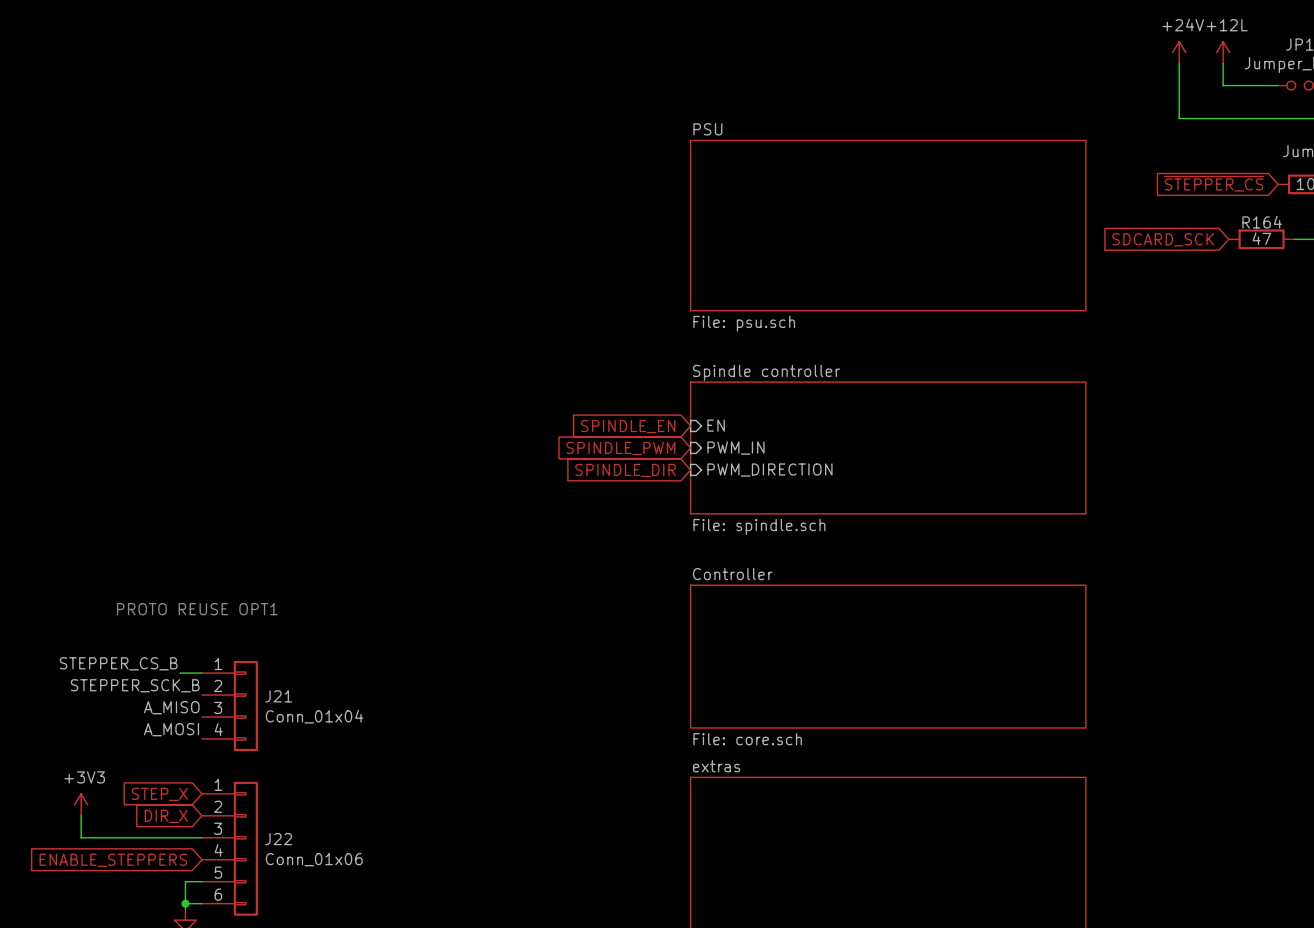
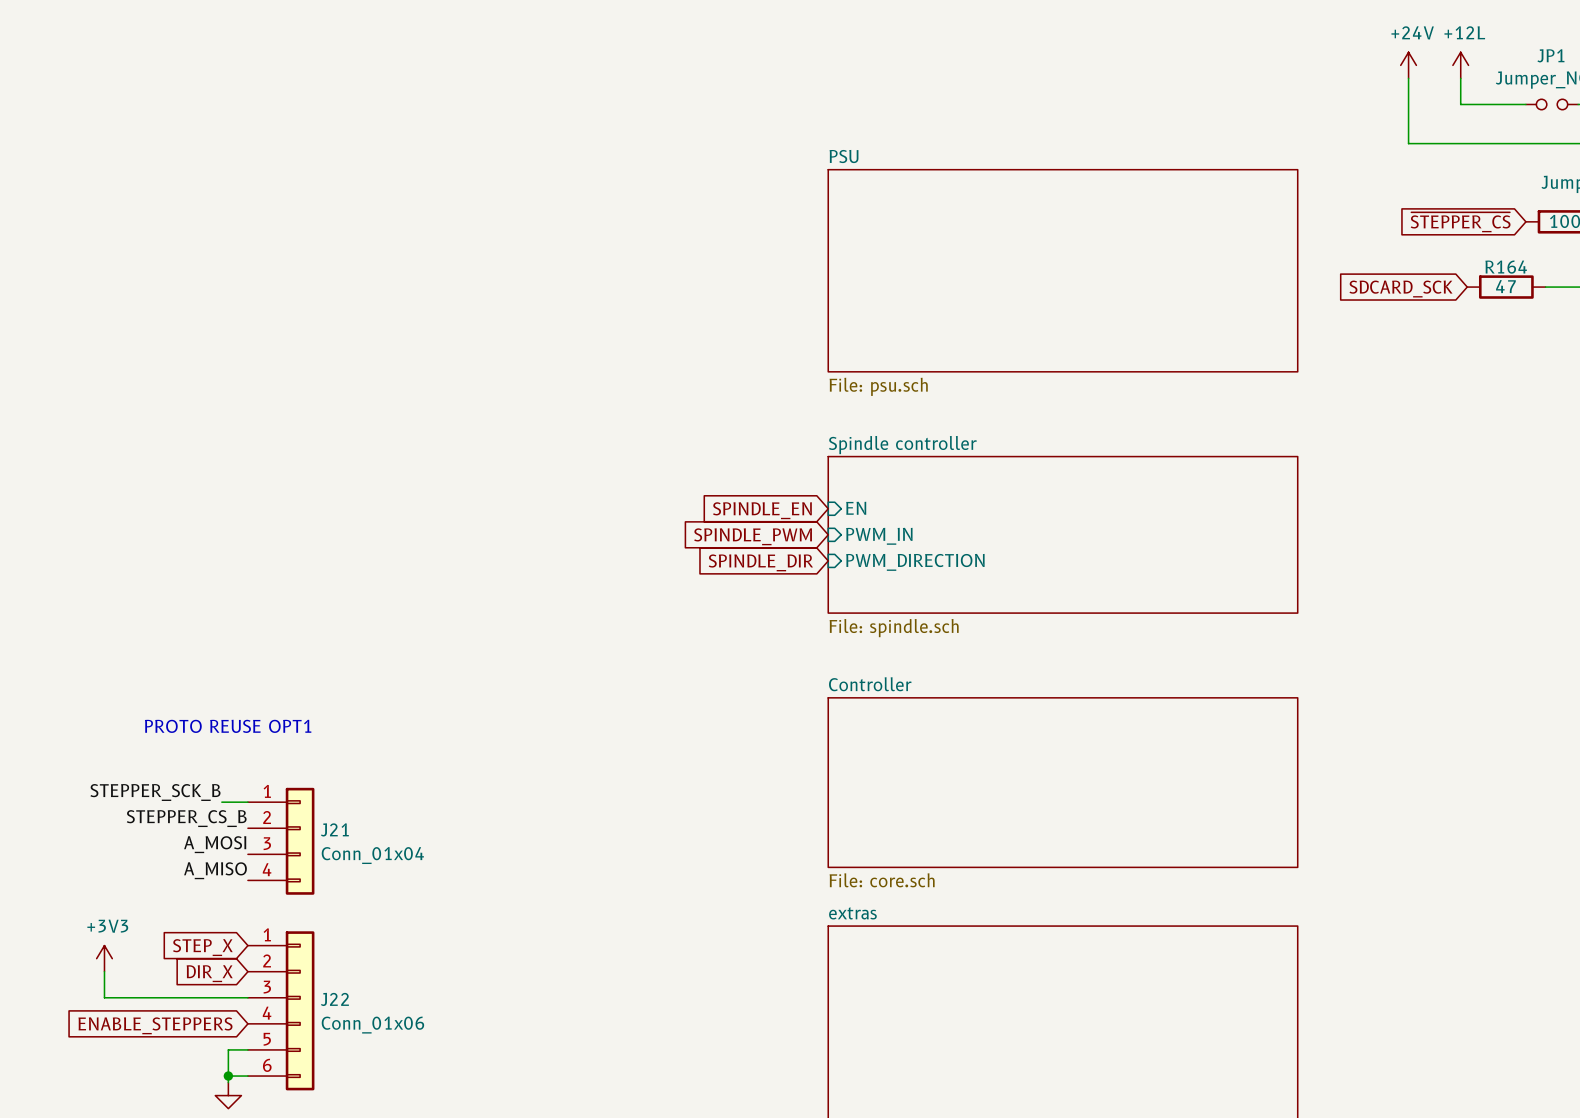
label: STEPPER_CS_B (118, 663) -> STEPPER_SCK_B (155, 792)
label: STEPPER_SCK_B (135, 685) -> STEPPER_CS_B (186, 818)
label: A_MISO (171, 707) -> A_MOSI (215, 844)
label: A_MOSI (171, 729) -> A_MISO (215, 870)

